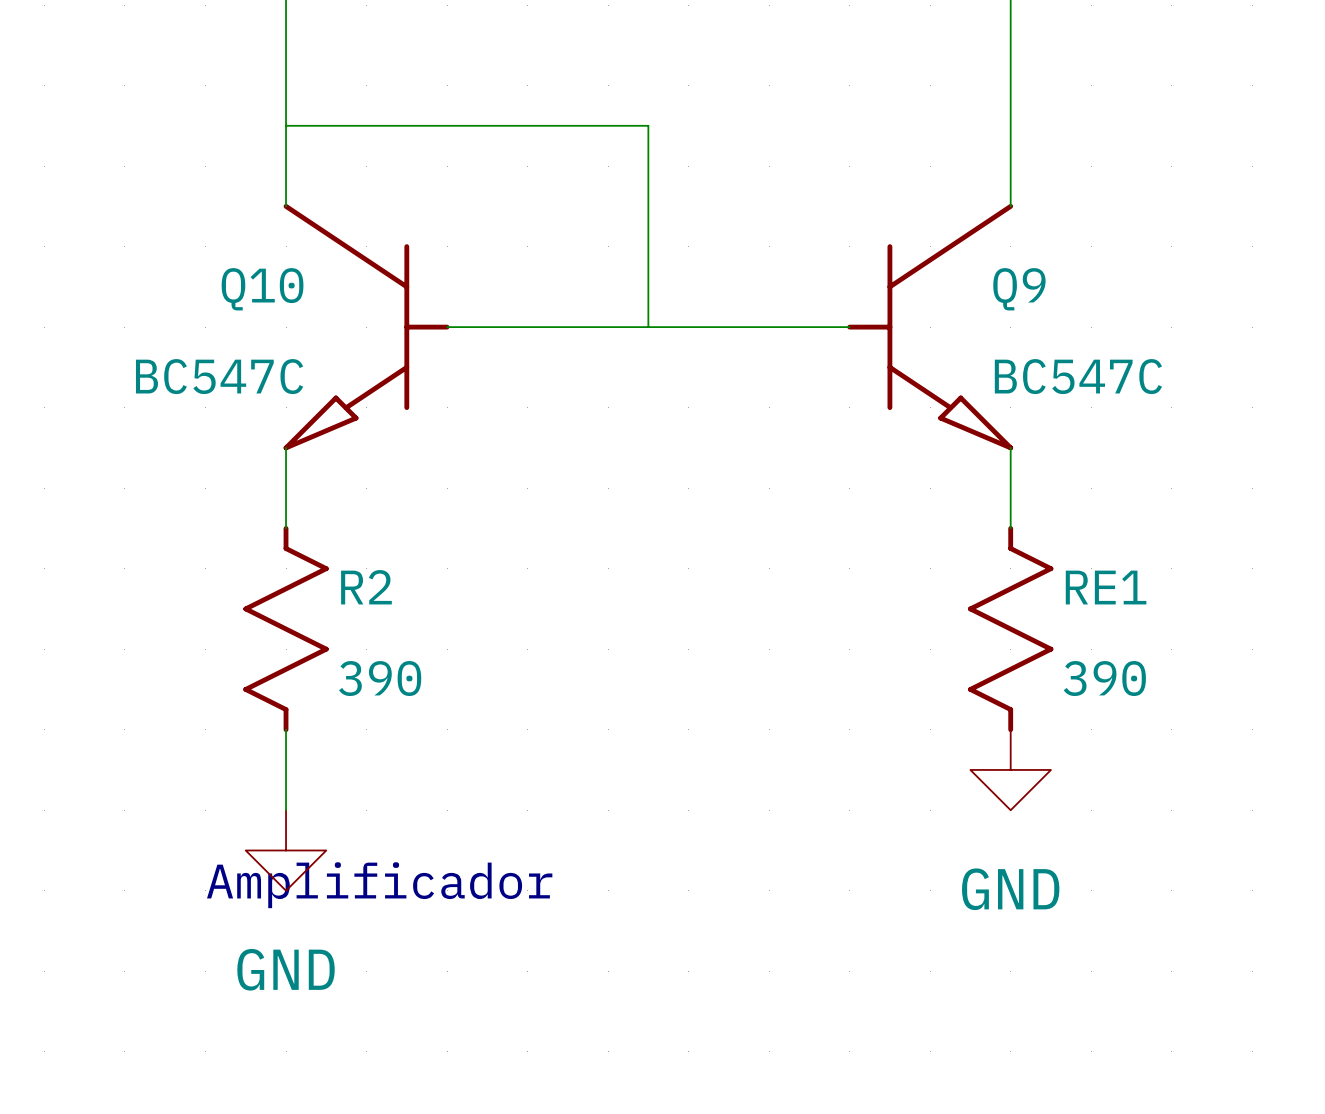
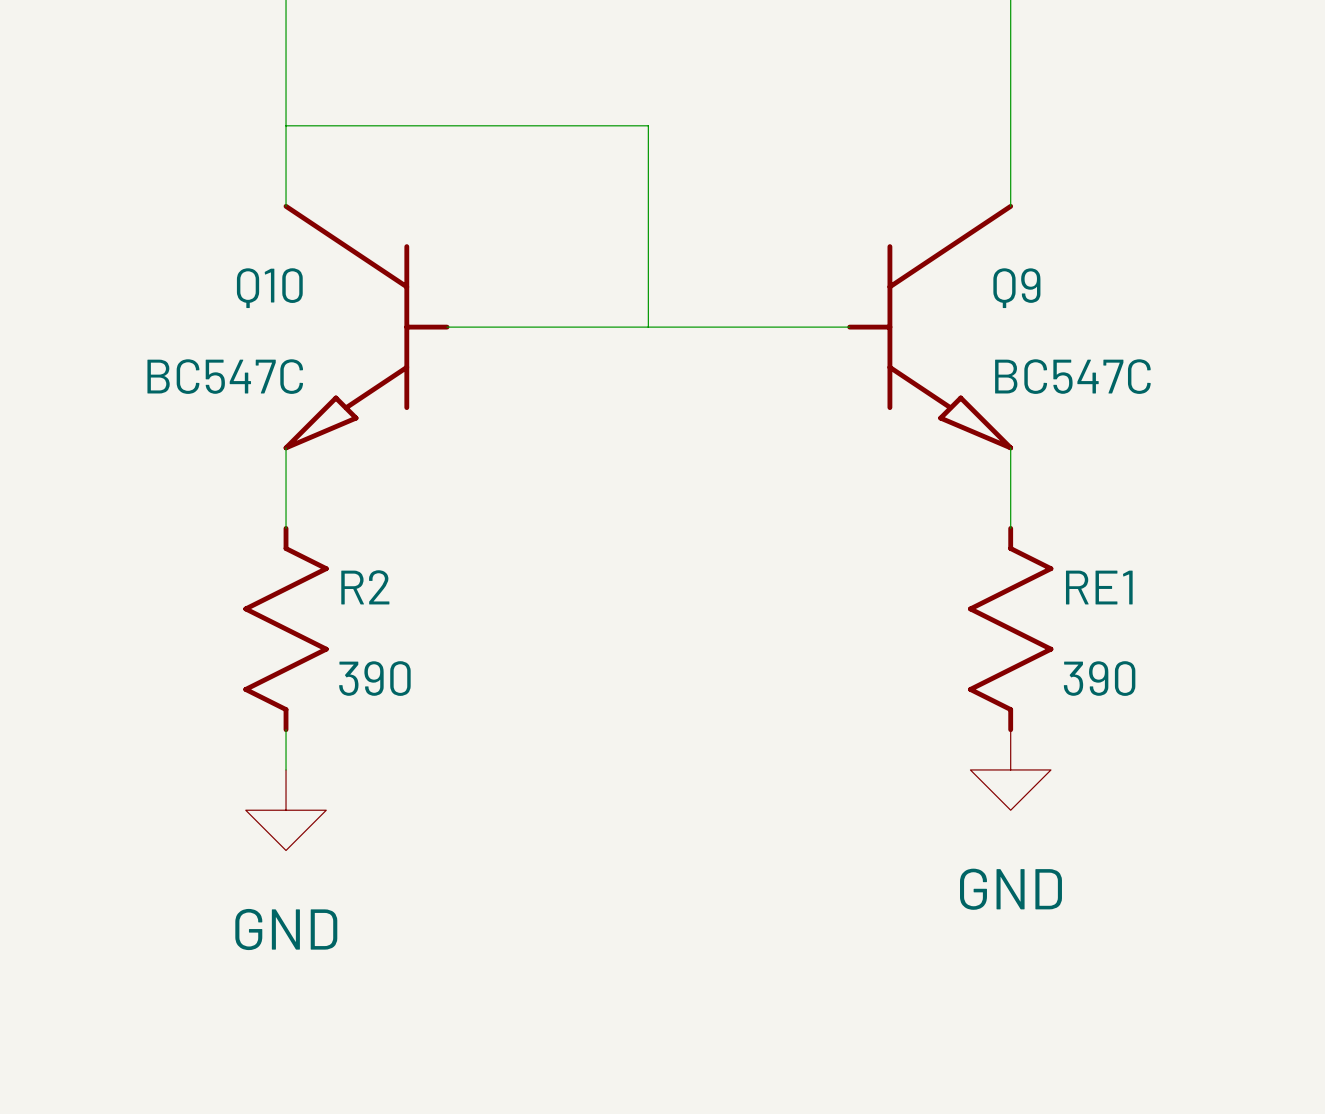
power symbol position: GND (286, 850) -> GND (286, 810)
text: Amplificador (379, 885) -> none

